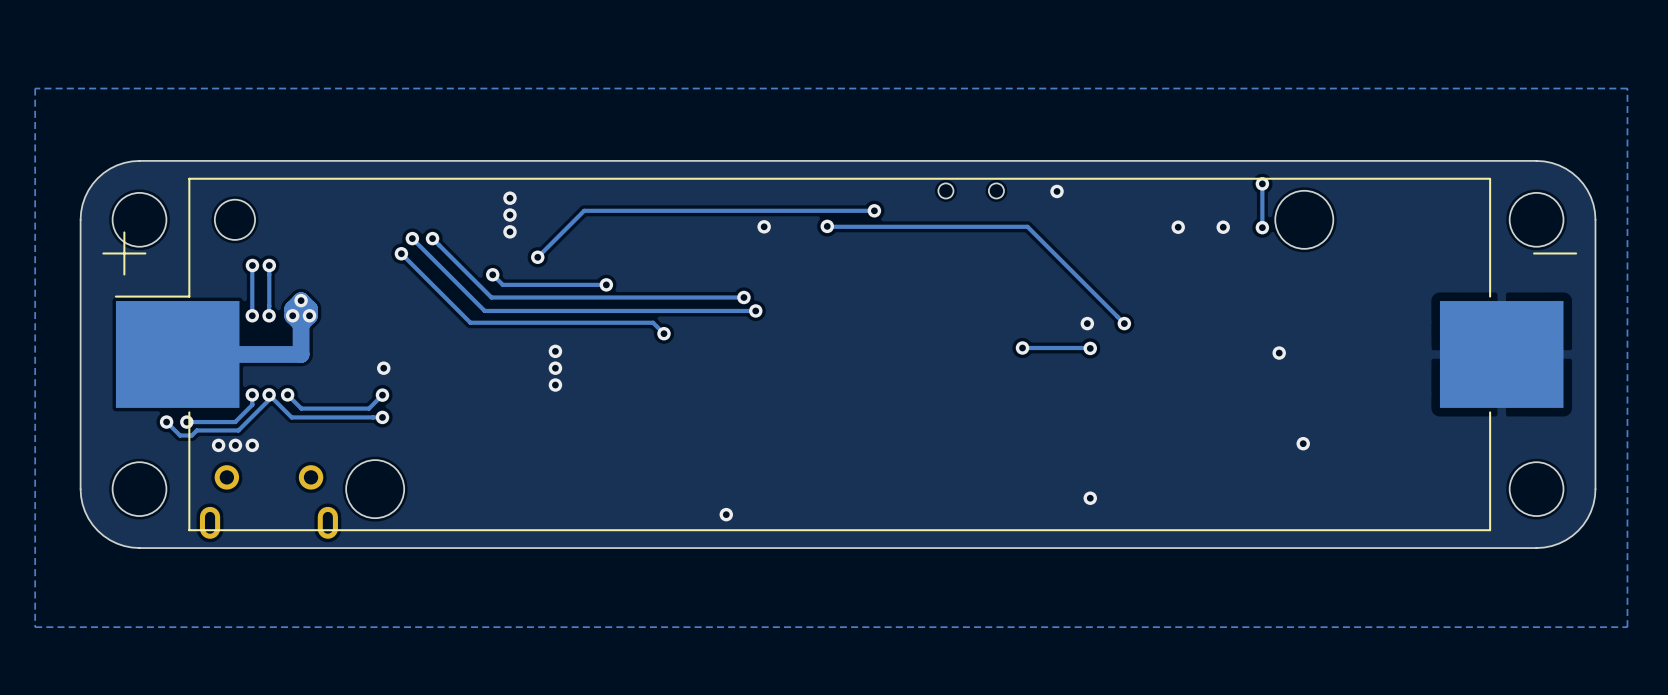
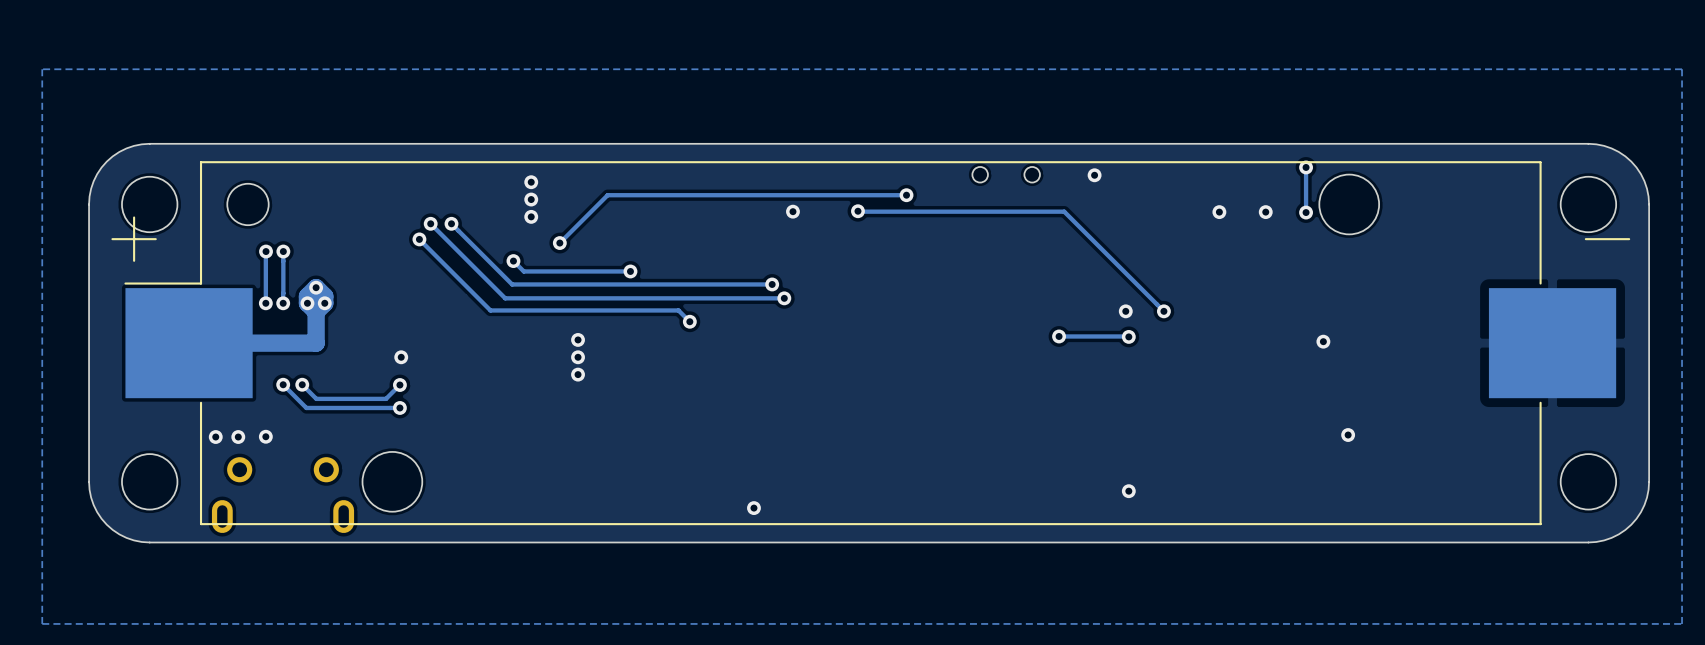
track: (252, 394) (252, 404) (235, 422) (186, 422) -> none
via: (252, 394) -> none
track: (269, 394) (269, 399) (238, 430) (196, 430) (191, 435) (180, 435) (166, 422) -> none
via: (166, 422) -> none
via: (186, 422) -> none
via: none -> (215, 437)
via: (218, 445) -> none
via: none -> (238, 437)
via: (235, 445) -> none

